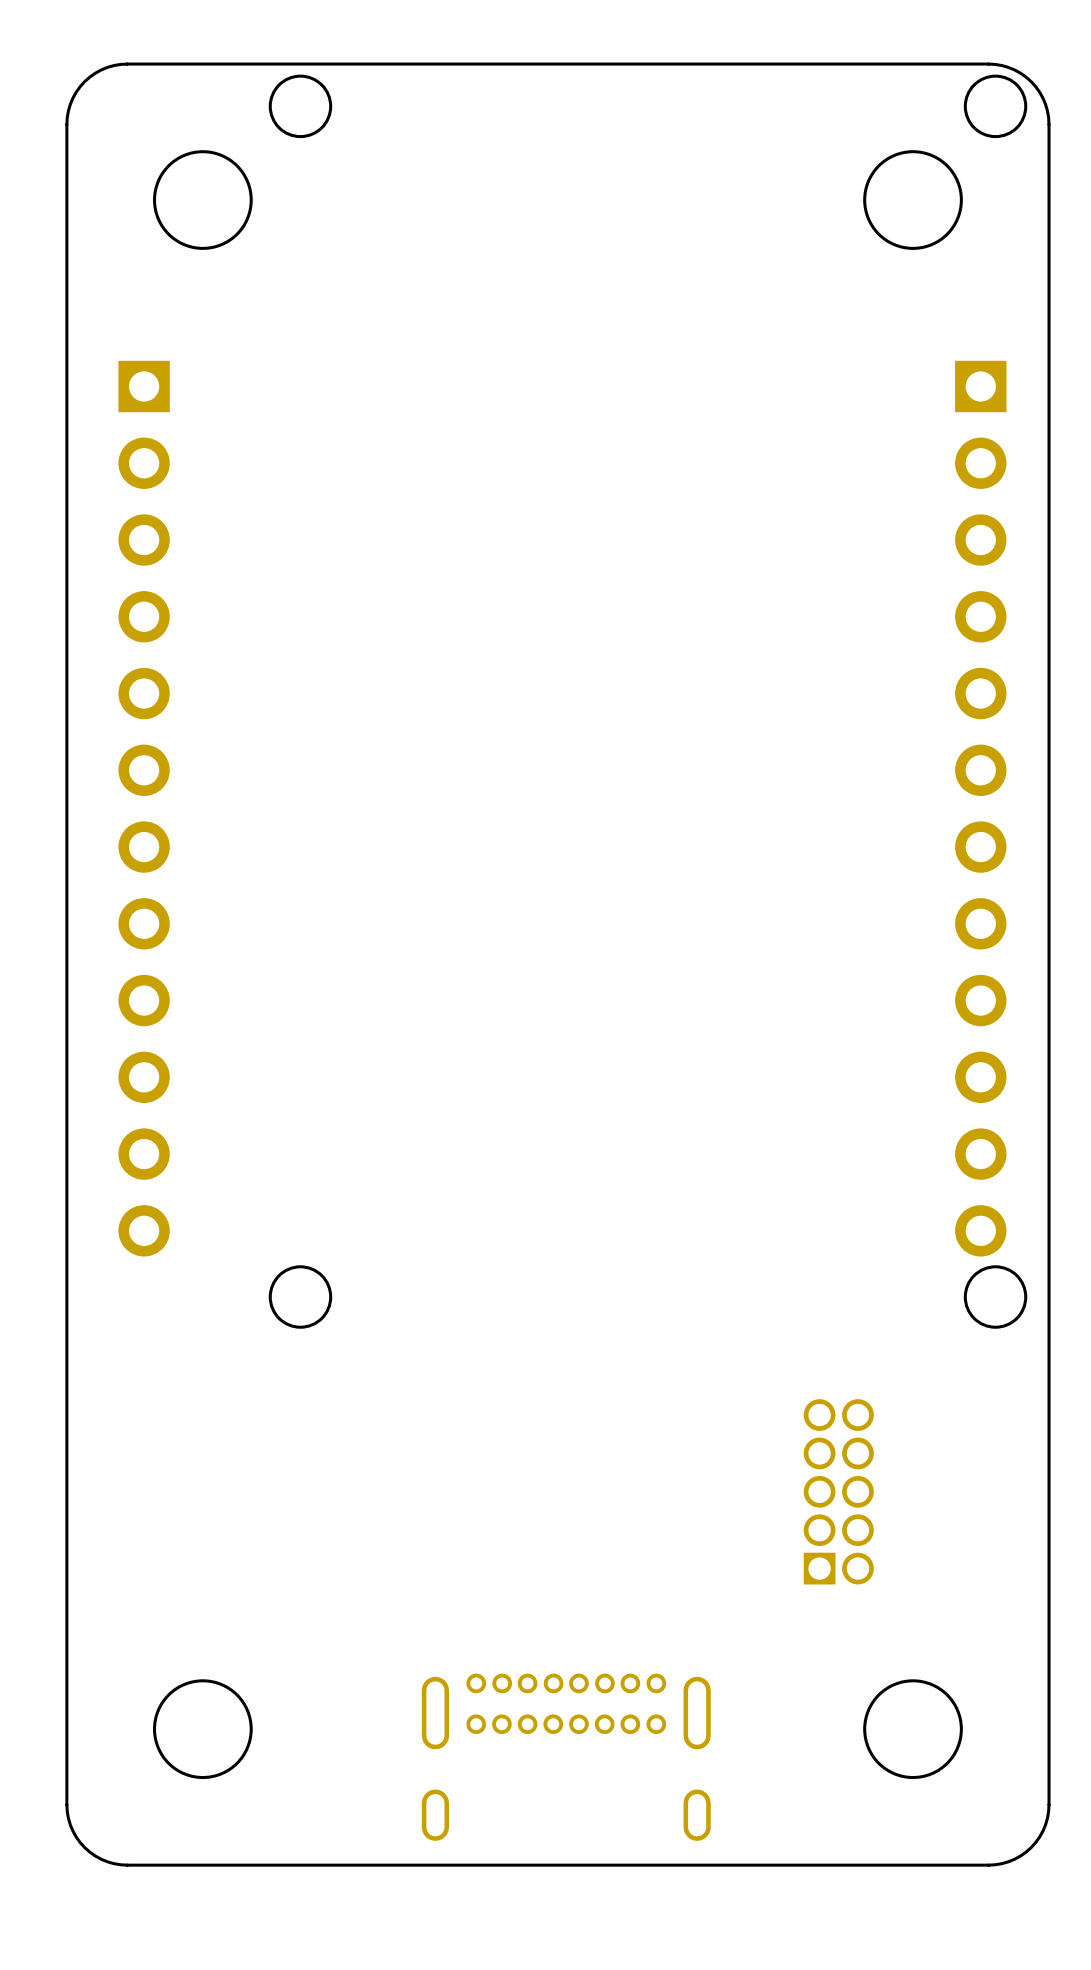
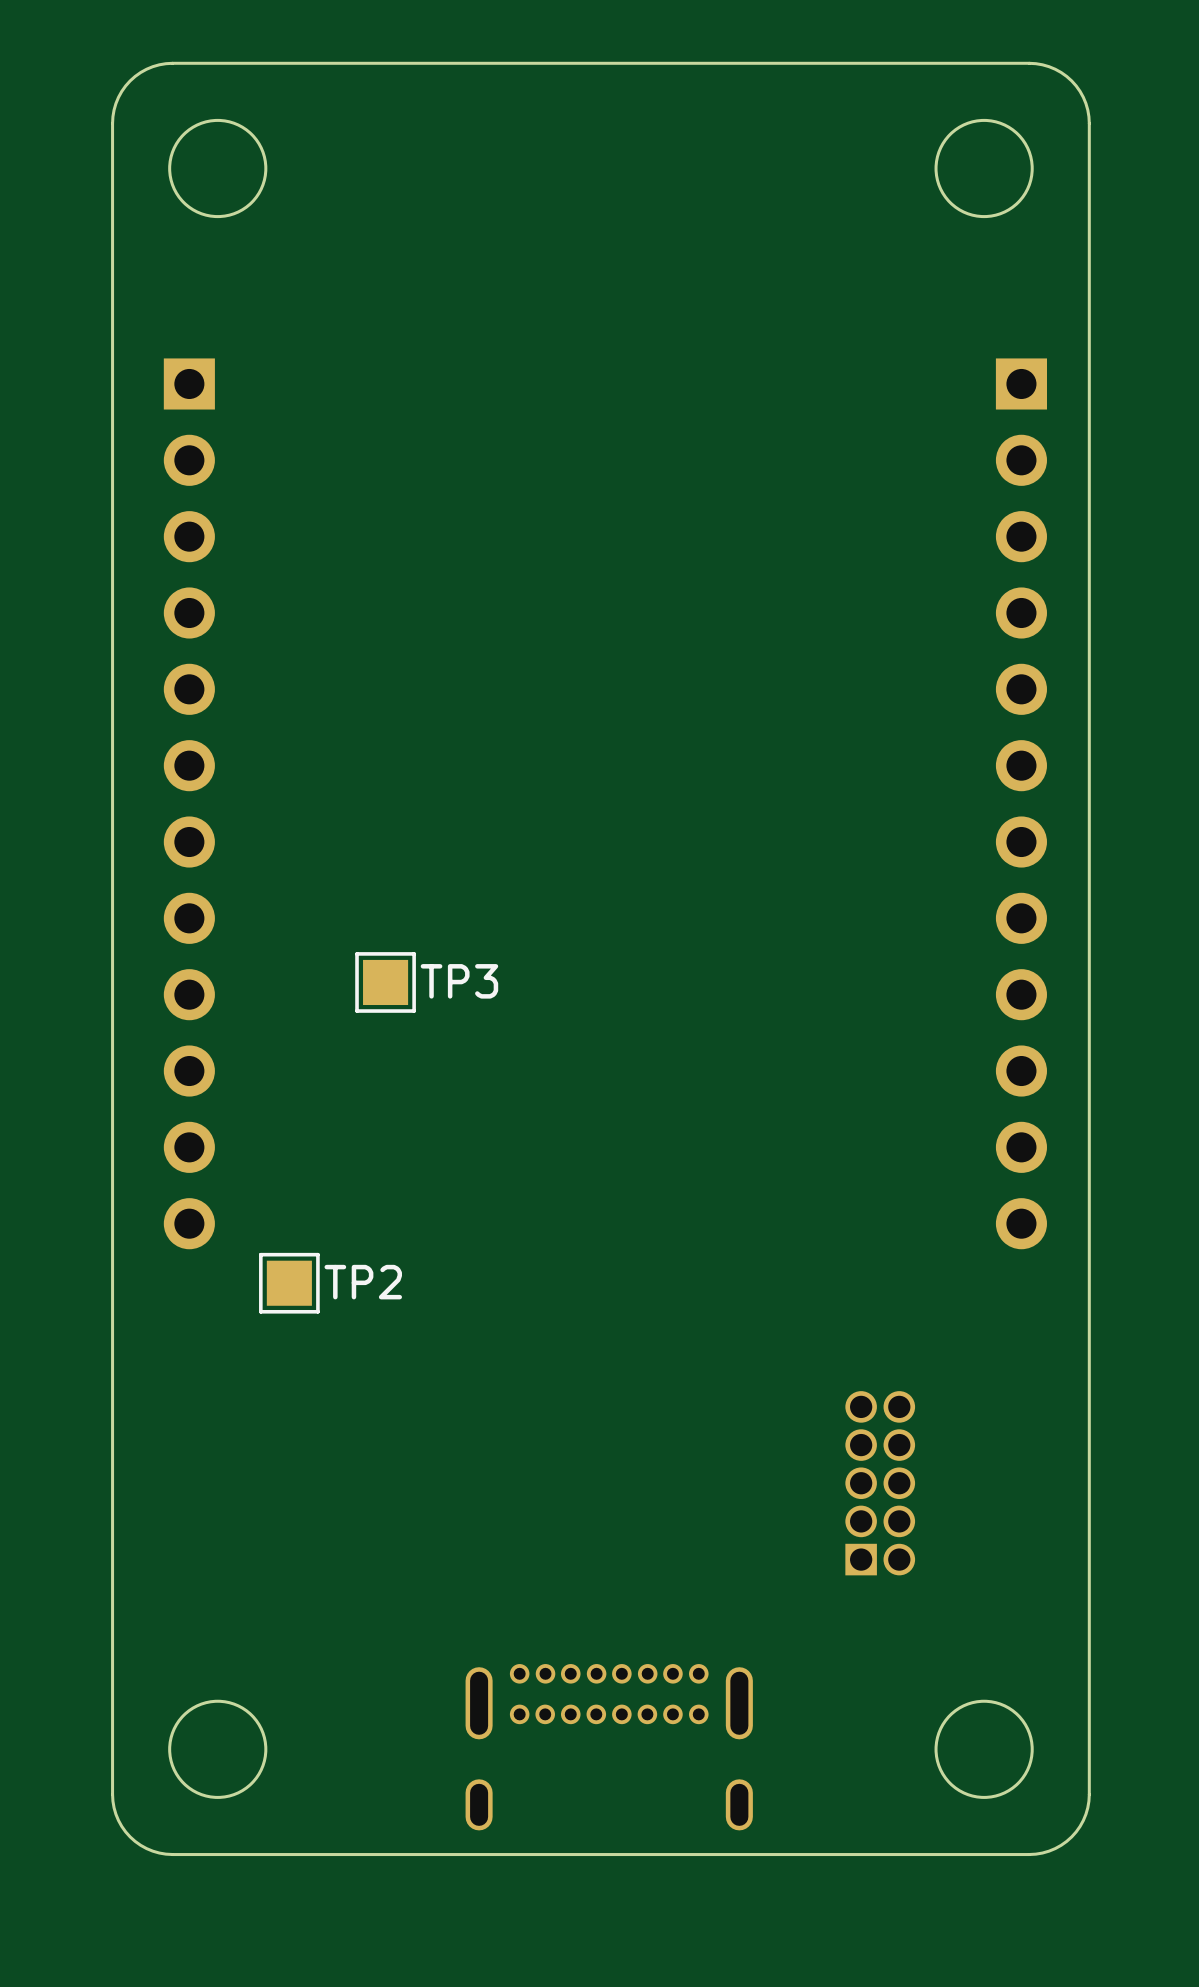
round board edge: [268, 74, 333, 139] -> none
round board edge: [963, 74, 1028, 139] -> none
round board edge position: (202, 200) -> (217, 168)
round board edge position: (913, 200) -> (984, 168)
TP3: none -> (385, 982)
round board edge: [268, 1265, 333, 1329] -> none
round board edge: [963, 1265, 1028, 1329] -> none
TP2: none -> (289, 1283)
round board edge position: (202, 1729) -> (217, 1749)
round board edge position: (913, 1729) -> (984, 1749)

